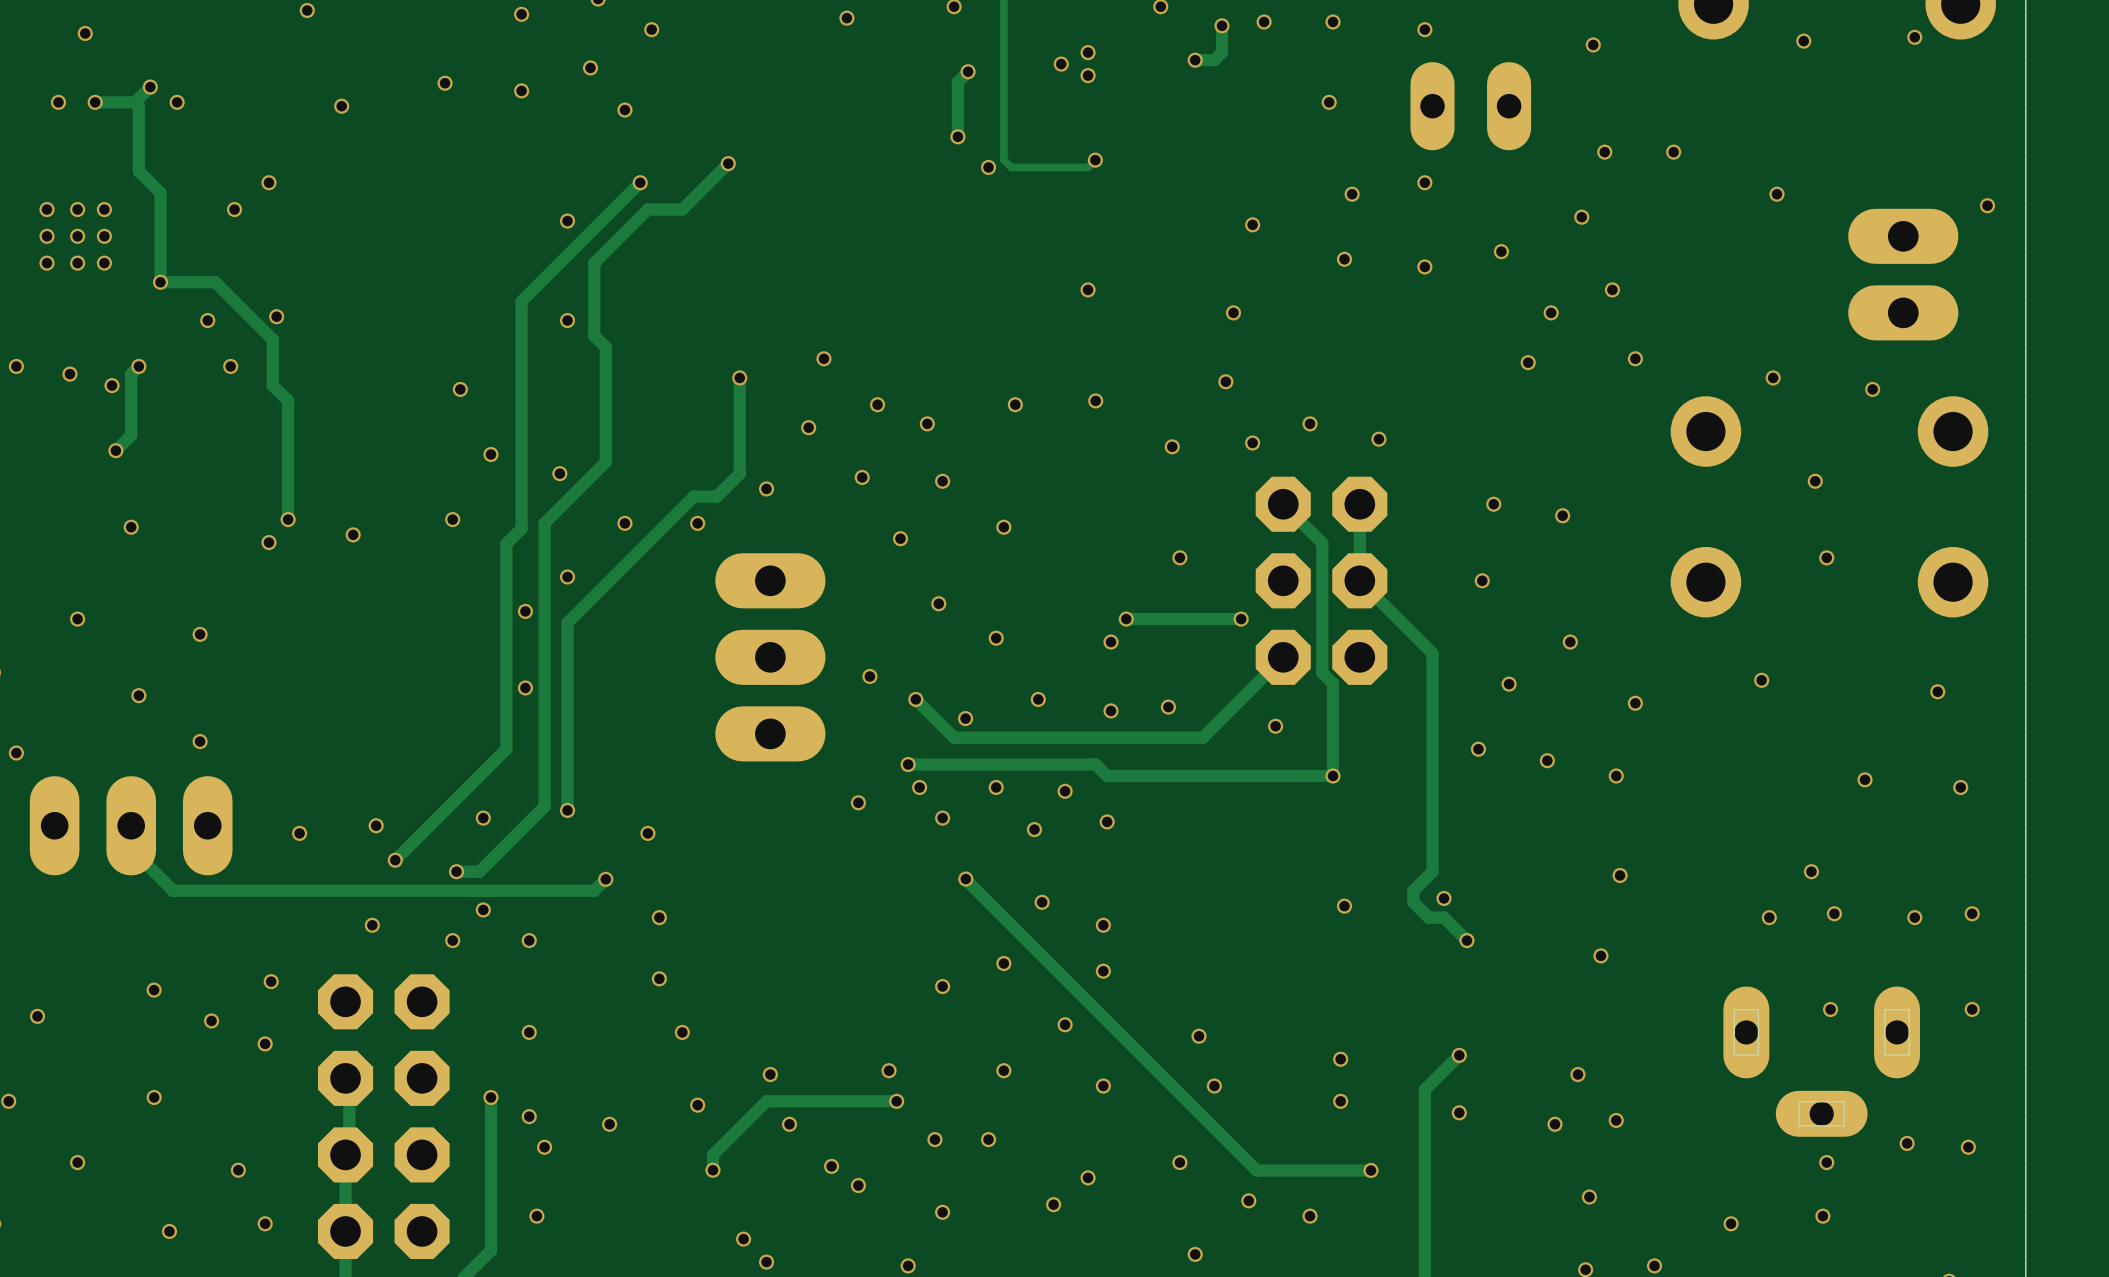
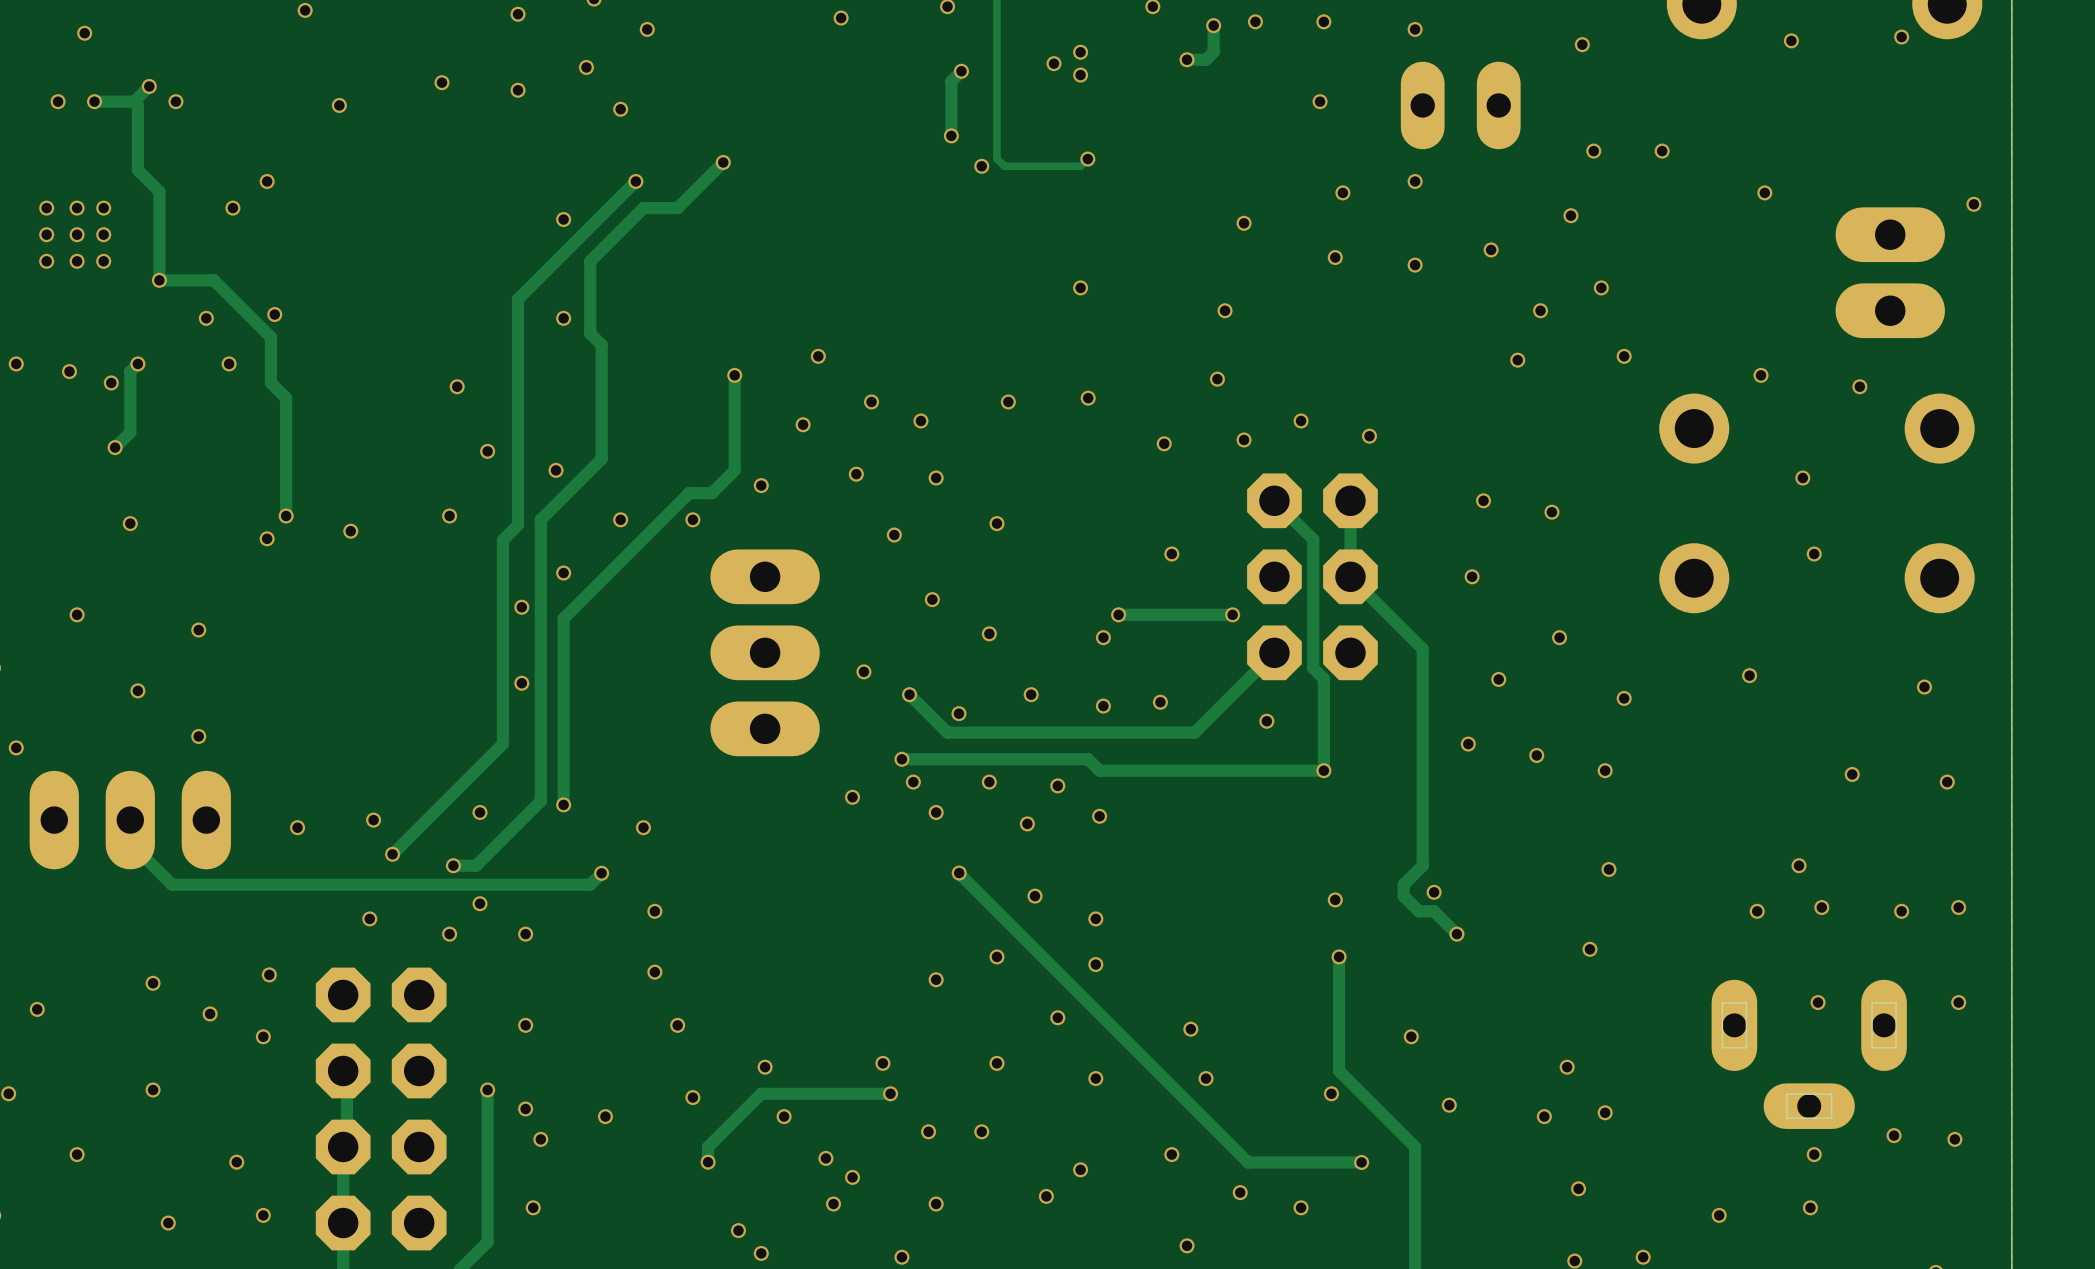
via: none -> (1339, 956)
track: (1459, 1055) (1424, 1089) (1424, 1154) -> (1339, 956) (1339, 1070) (1415, 1147)
via position: (1459, 1055) -> (1411, 1036)
via: (1340, 1059) -> none
via: none -> (833, 1204)

